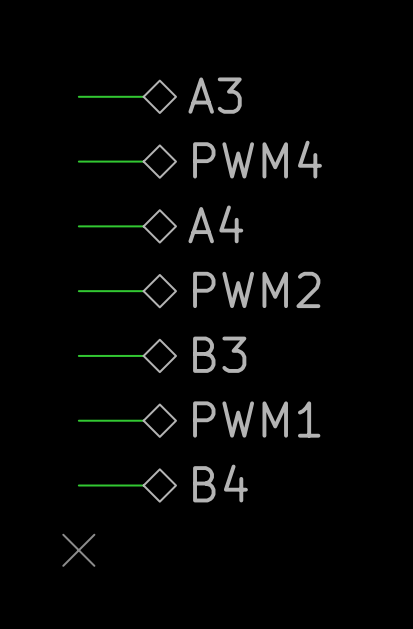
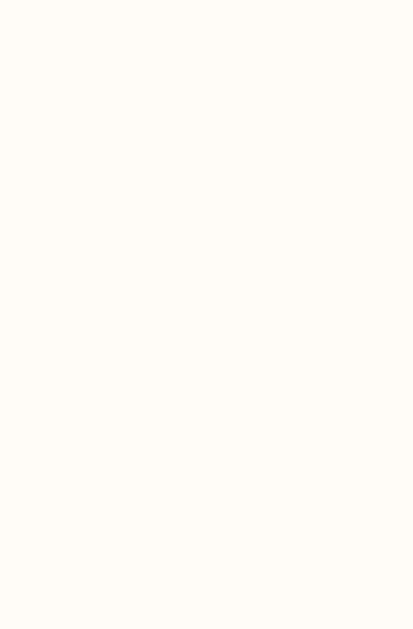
hierarchical label: A3 (215, 95) -> none
wire: (78, 96) (143, 96) -> none
hierarchical label: PWM4 (257, 159) -> none
wire: (78, 161) (143, 161) -> none
hierarchical label: A4 (215, 224) -> none
wire: (78, 226) (143, 226) -> none
hierarchical label: PWM2 (256, 289) -> none
wire: (78, 291) (143, 291) -> none
hierarchical label: B3 (219, 354) -> none
wire: (78, 355) (143, 355) -> none
hierarchical label: PWM1 (256, 419) -> none
wire: (78, 420) (143, 420) -> none
hierarchical label: B4 (220, 483) -> none
wire: (78, 485) (143, 485) -> none
no-connect mark: (78, 550) -> none

